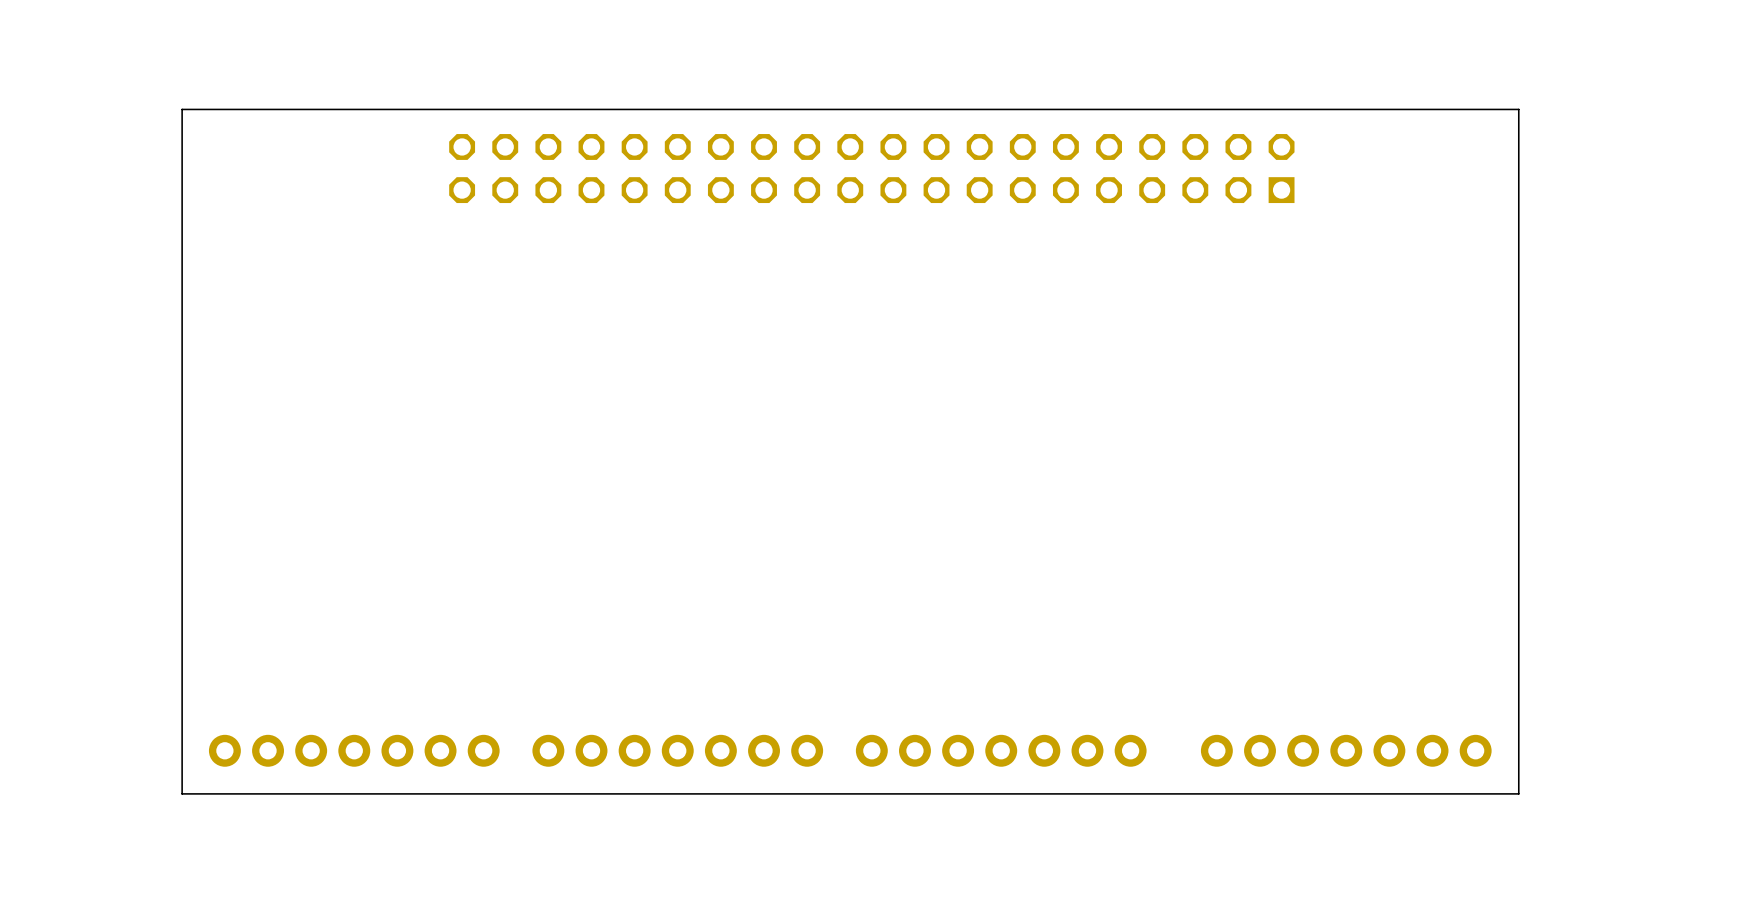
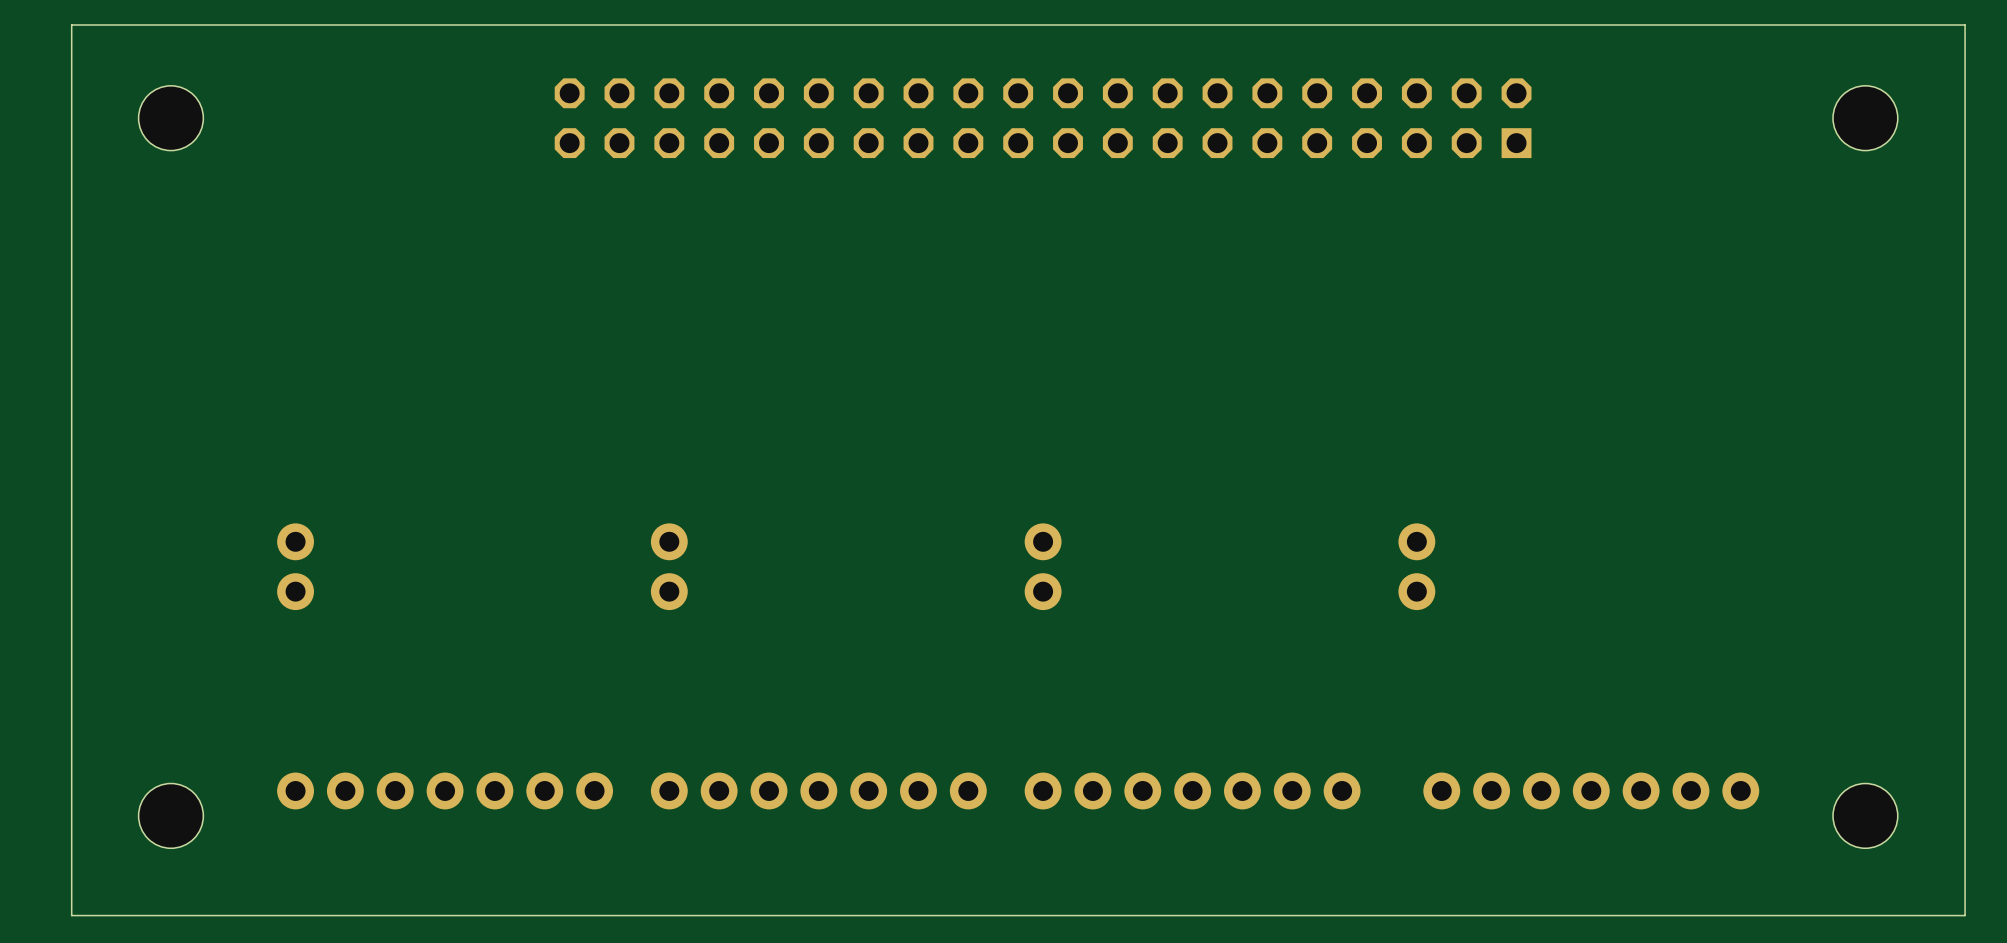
board edge: (1518, 109) (182, 109) (182, 793) (1518, 793) (1518, 109) -> (1965, 25) (1965, 915) (71, 915) (71, 25) (1965, 25)
part: none -> (170, 118)
part: none -> (1865, 118)
part: none -> (295, 566)
part: none -> (669, 566)
part: none -> (1043, 566)
part: none -> (1416, 566)
part: none -> (170, 815)
part: none -> (1865, 815)

